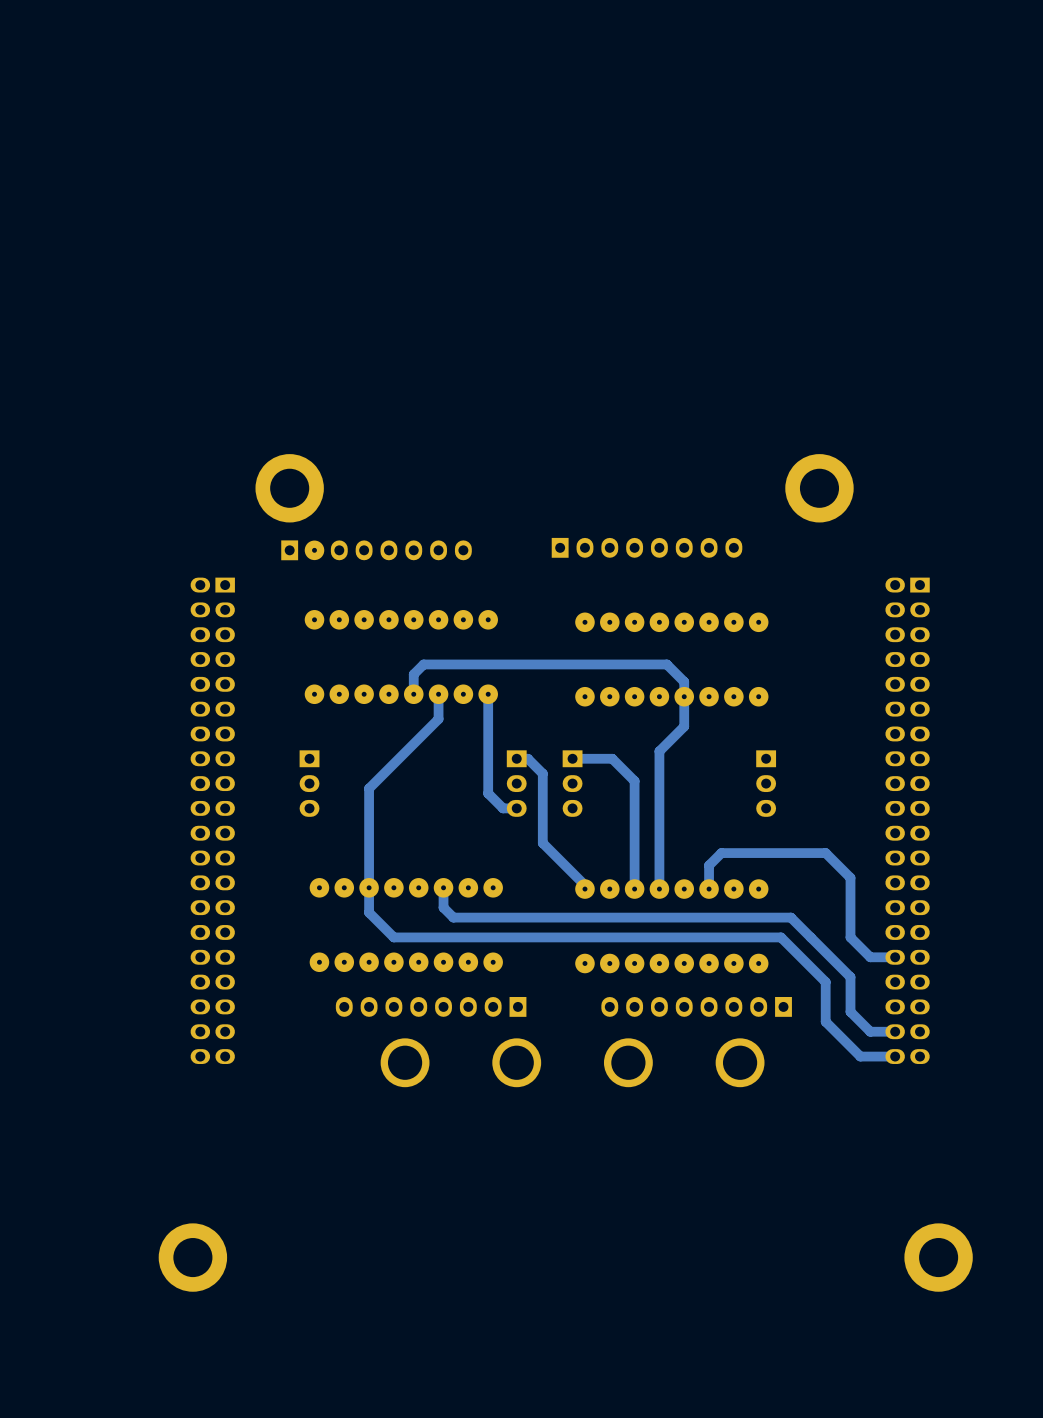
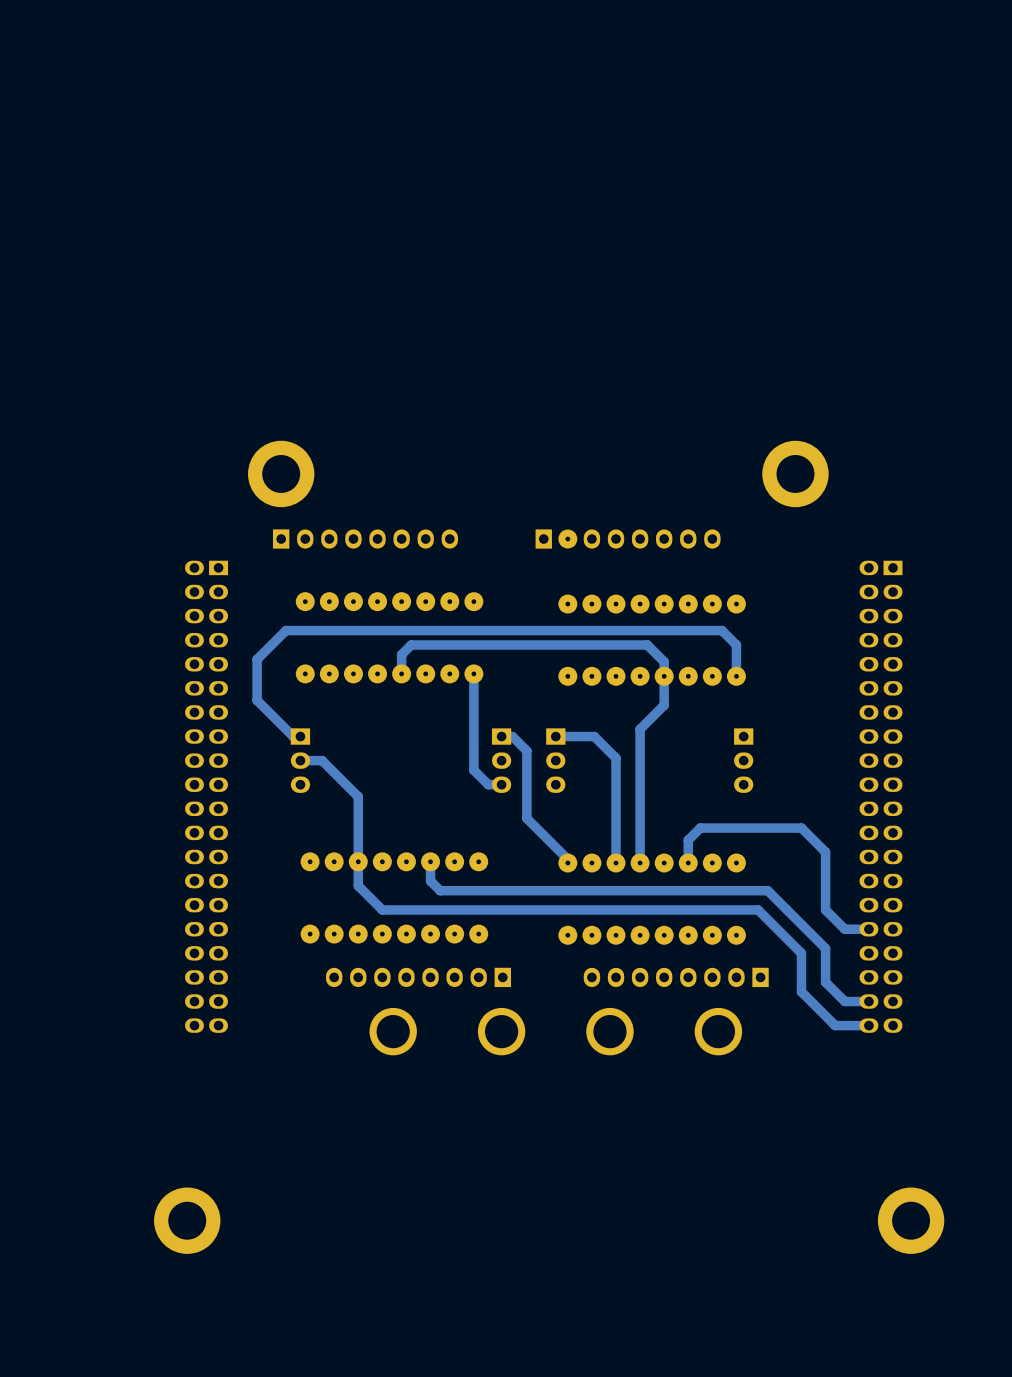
part footprint: [551, 537, 743, 558] -> [535, 529, 721, 549]
part footprint: [281, 540, 472, 561] -> [273, 529, 459, 549]
track: (438, 694) (438, 719) (369, 788) (369, 820) -> (300, 760) (322, 760) (358, 796)
track: none -> (736, 676) (736, 645) (722, 630) (286, 630) (257, 659) (257, 700) (293, 736) (300, 736)

